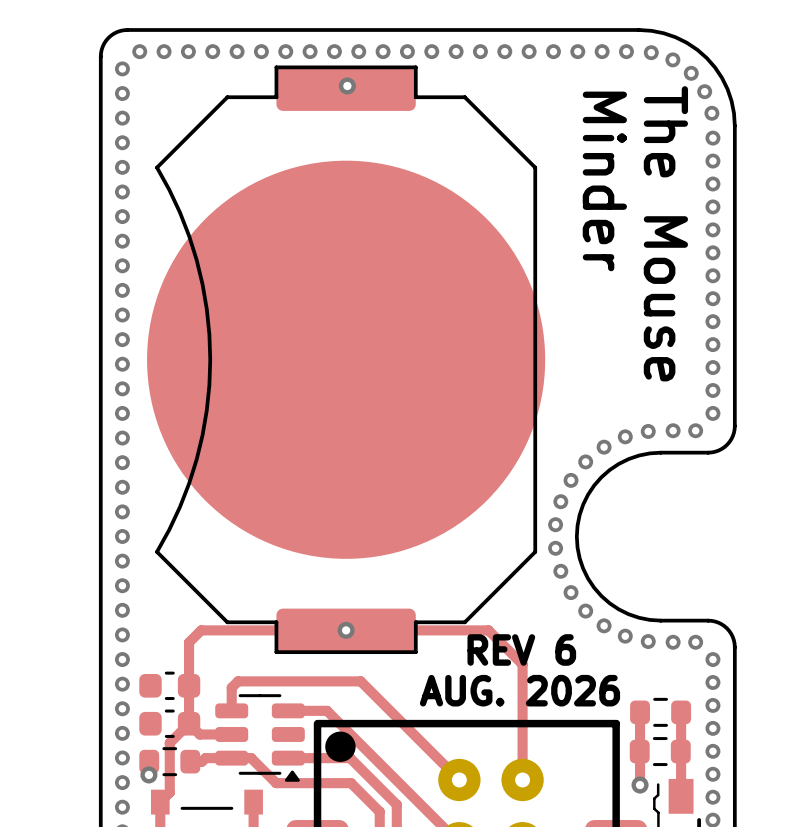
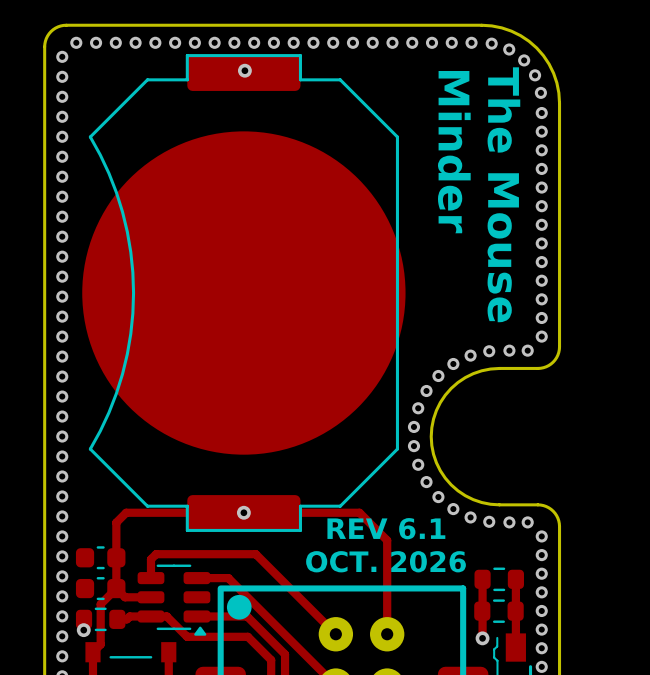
text: REV 6 (521, 649) -> REV 6.1 (386, 528)
text: AUG. 2026 (519, 690) -> OCT. 2026 (386, 561)

